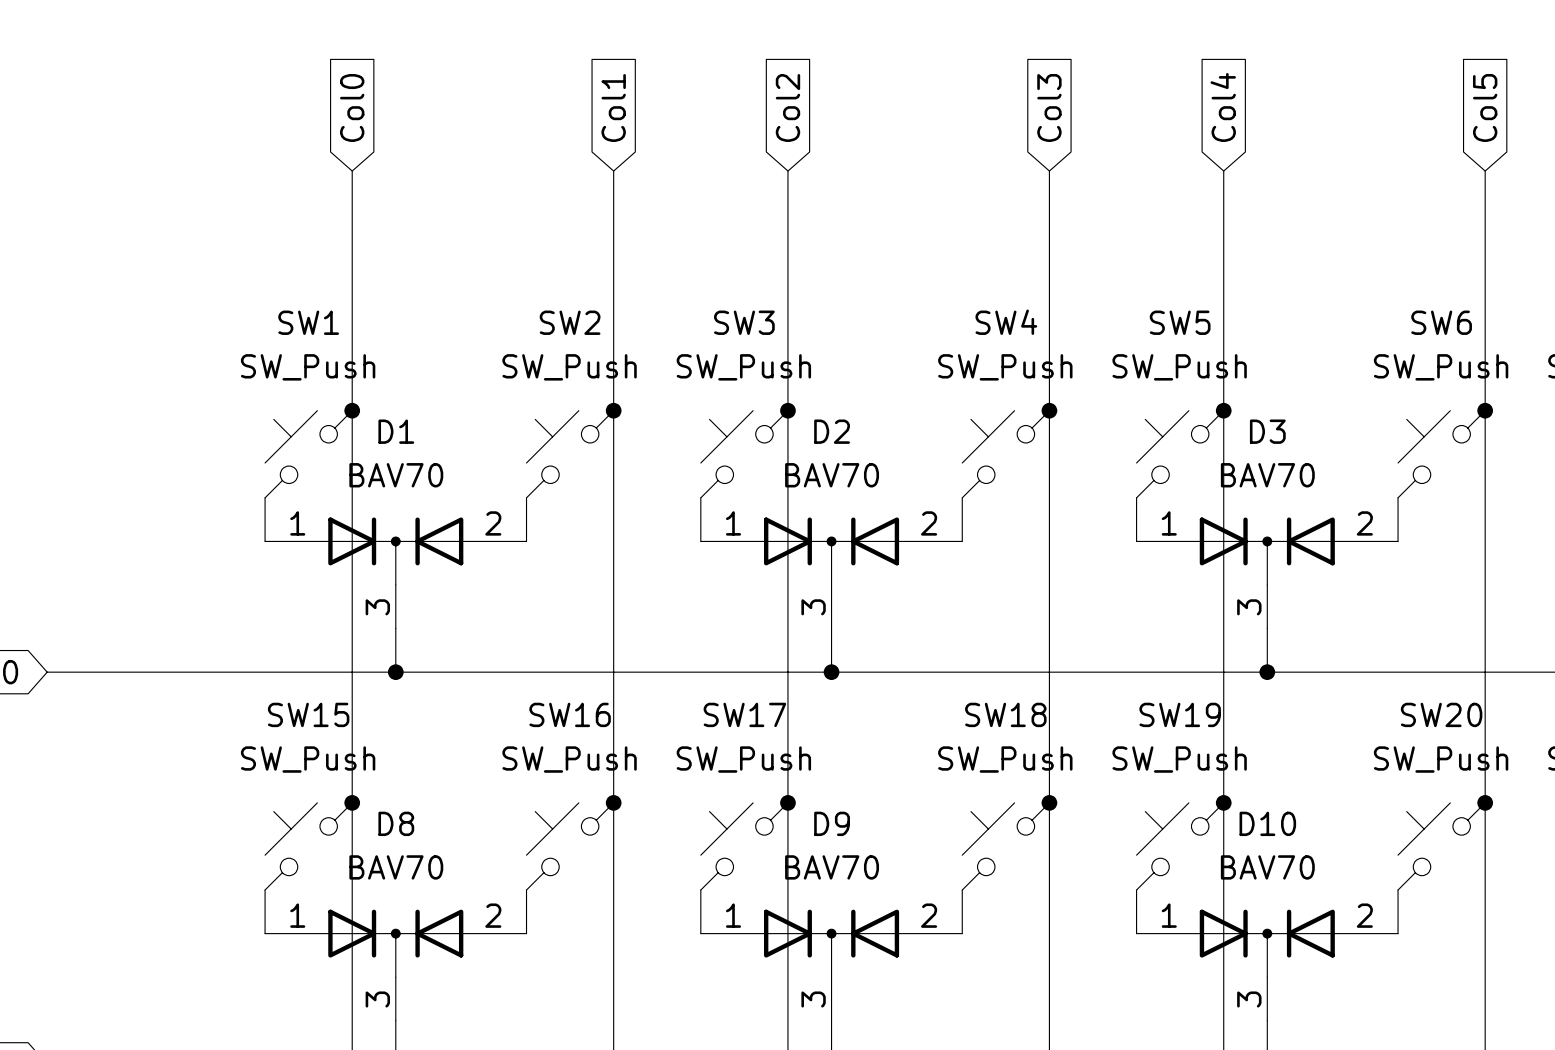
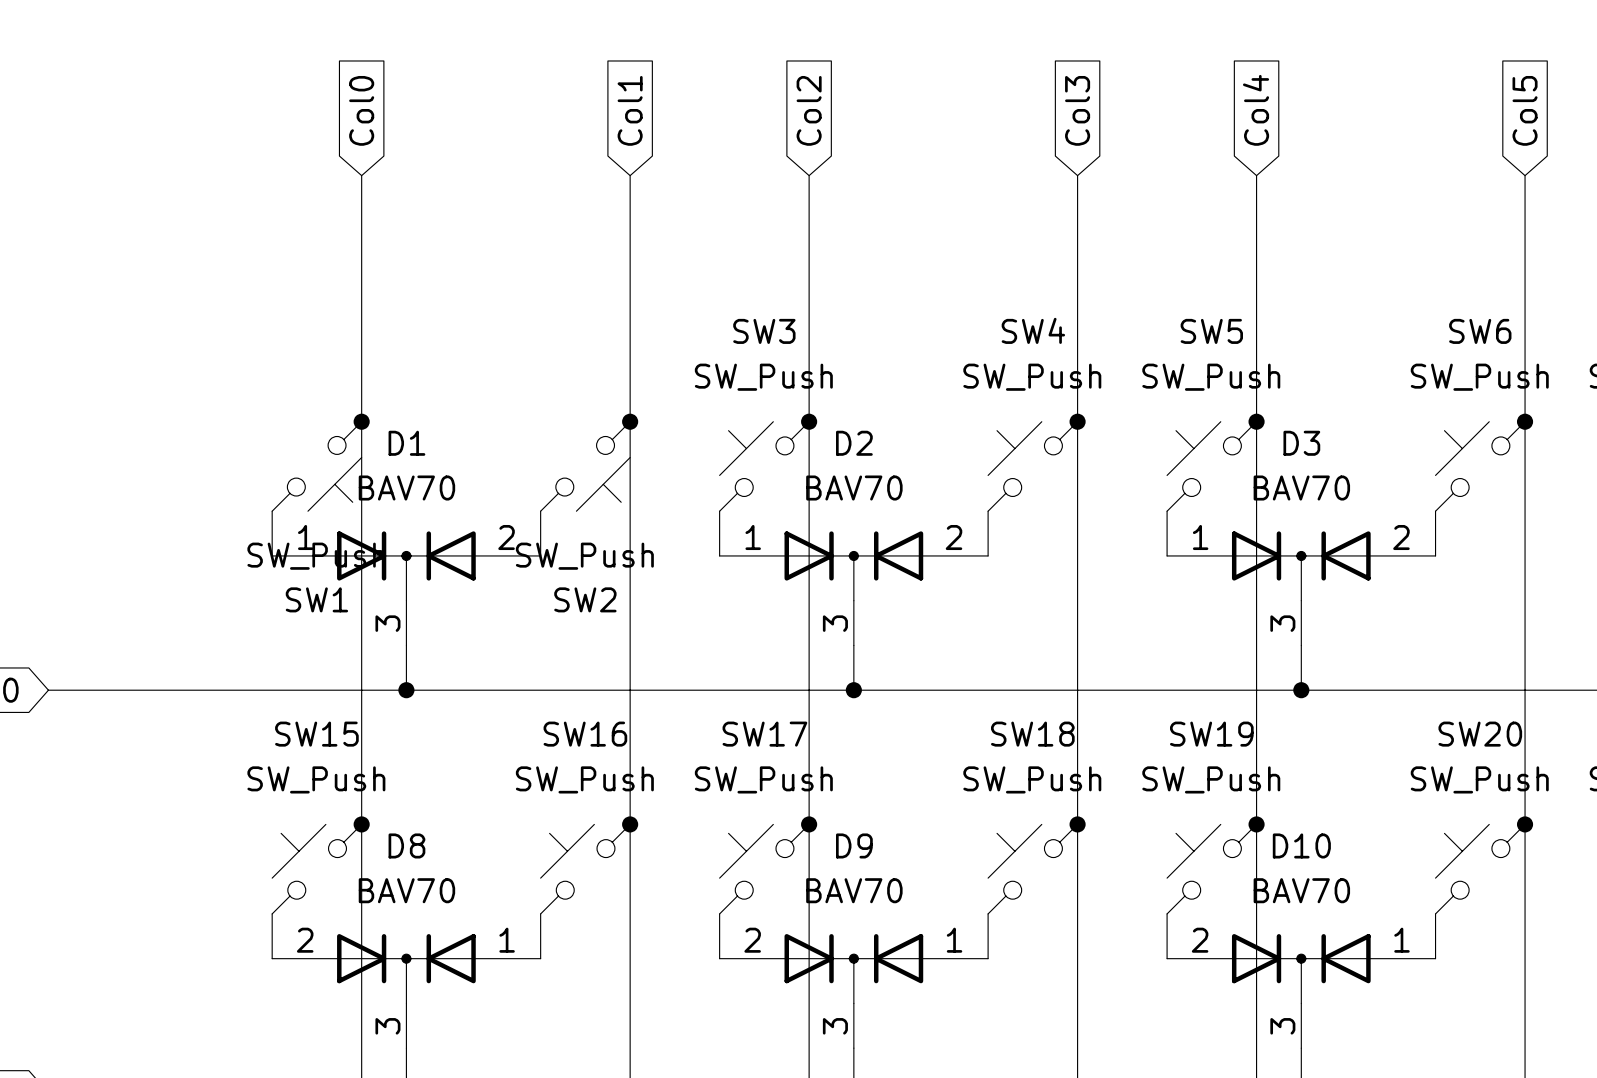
SW1 rotation: 0° (308, 454) -> 180° (316, 466)
SW2 rotation: 0° (570, 454) -> 180° (585, 466)
D8 flip: as is (395, 943) -> left-right (406, 968)
D9 flip: as is (831, 943) -> left-right (853, 968)
D10 flip: as is (1267, 943) -> left-right (1301, 968)

